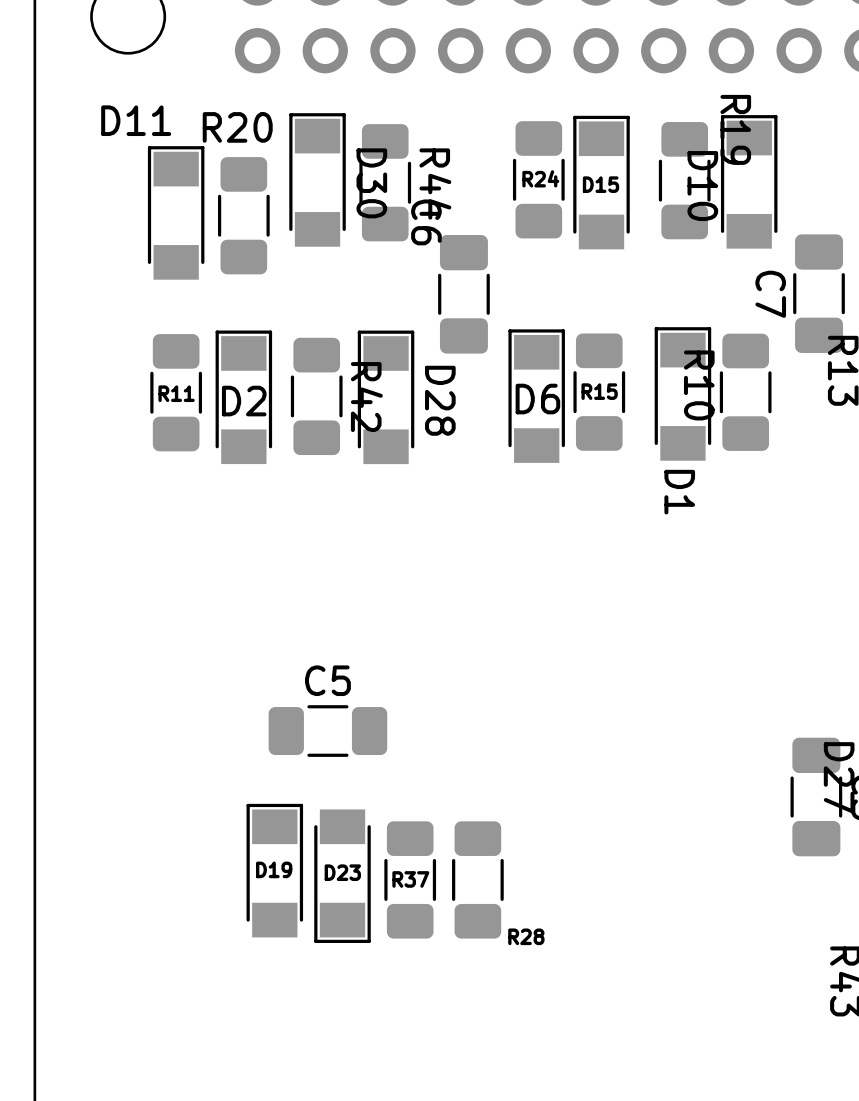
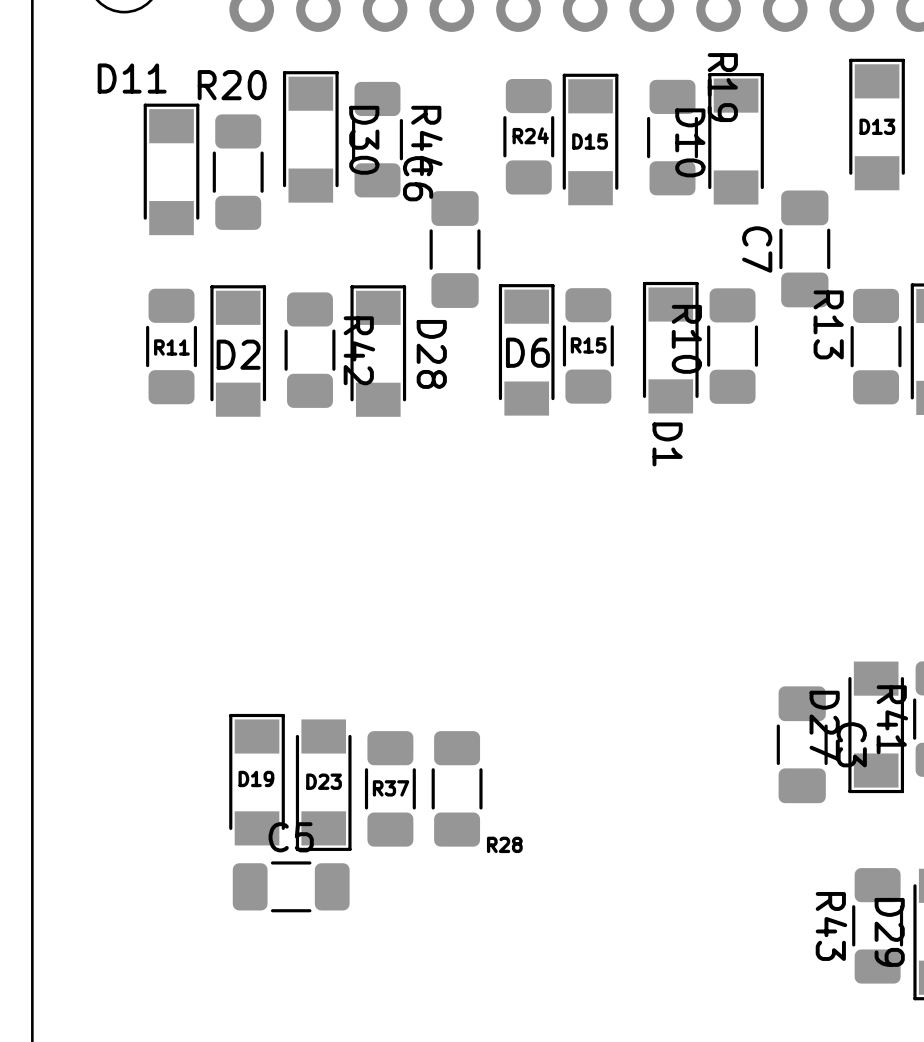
C5 position: (327, 731) -> (291, 886)
D19 position: (274, 870) -> (257, 779)
D23 position: (342, 876) -> (323, 785)
R37 position: (410, 879) -> (390, 788)
R28 position: (477, 879) -> (457, 788)

